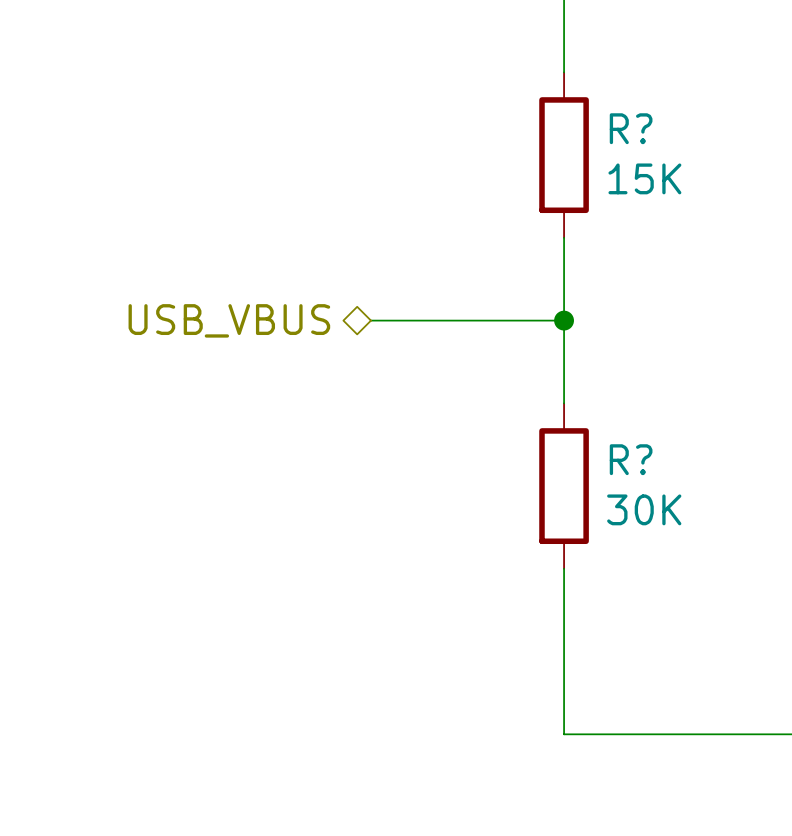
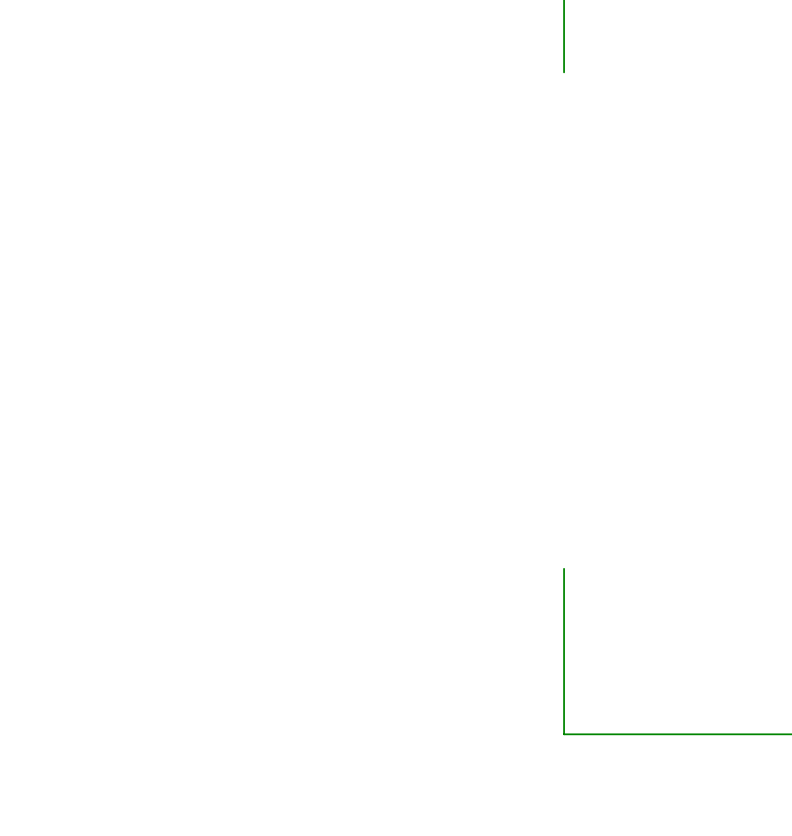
R?: 15K (564, 155) -> none
wire: (564, 237) (564, 403) -> none
hierarchical label: USB_VBUS (229, 320) -> none
wire: (370, 320) (564, 320) -> none
junction: (564, 320) -> none
R?: 30K (564, 486) -> none

